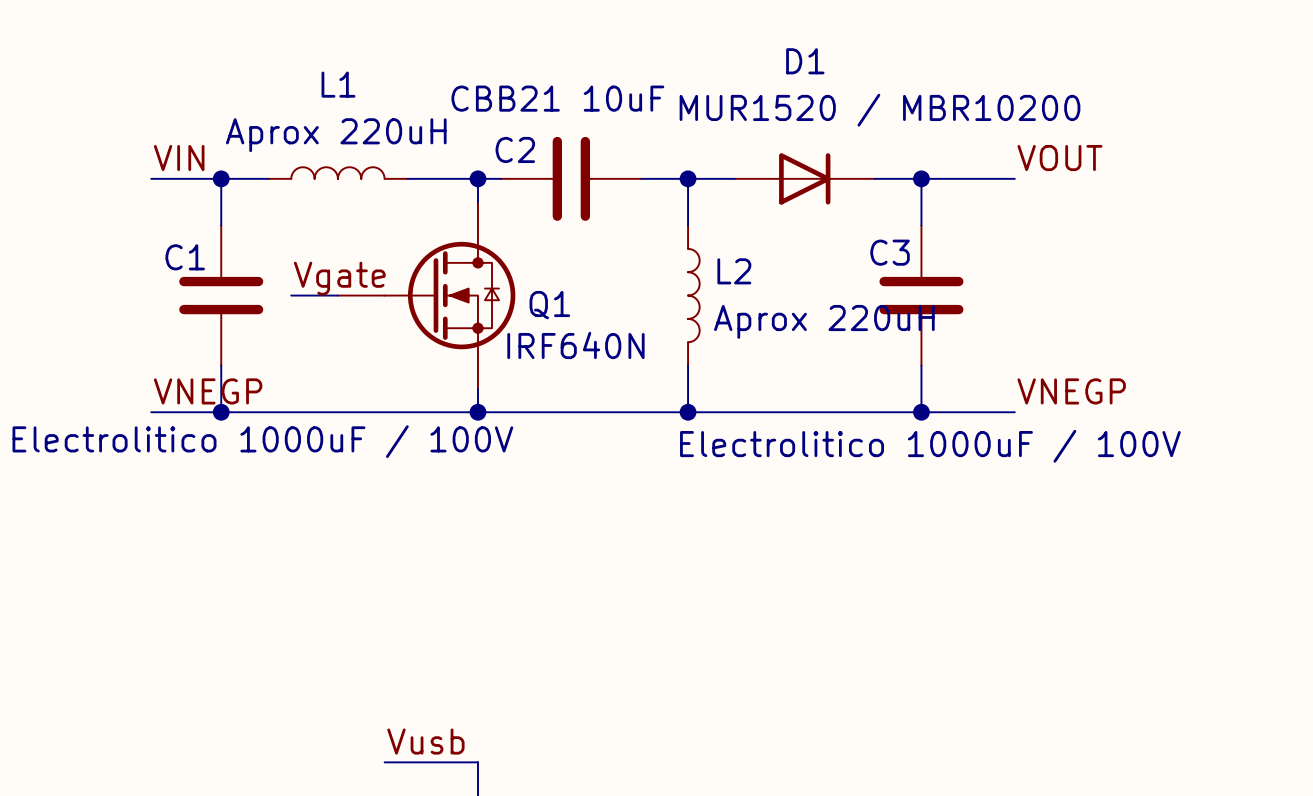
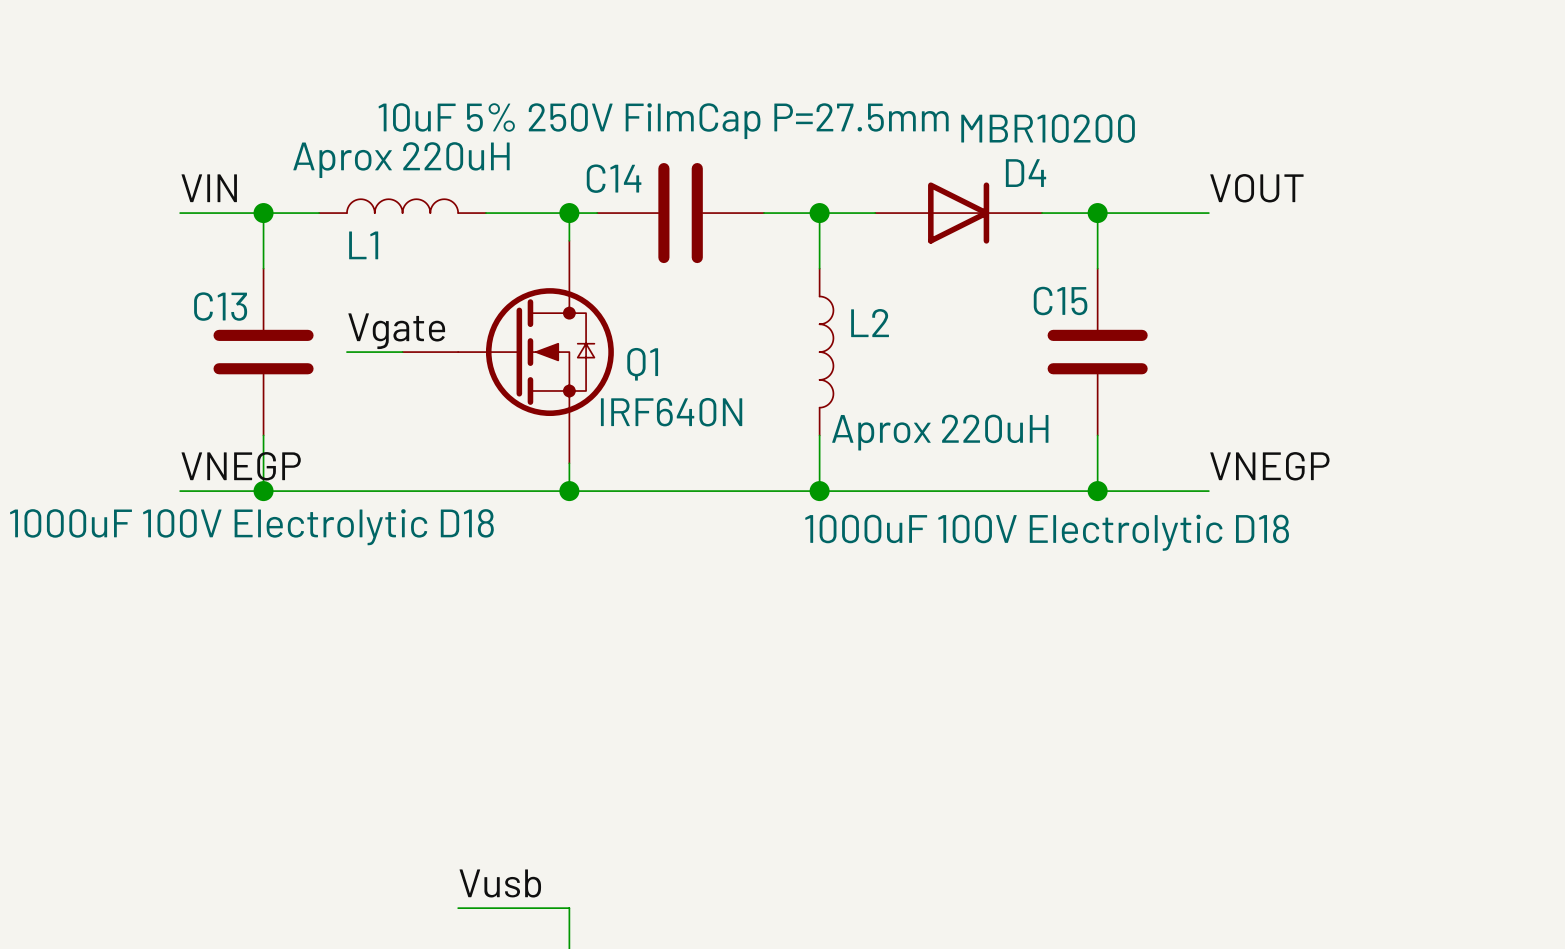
D1 name: D1 (805, 61) -> D4 (1026, 173)
L1 name position: L1 (338, 84) -> L1 (363, 245)
C2 value: CBB21 10uF (557, 98) -> 10uF 5% 250V FilmCap P=27.5mm (663, 121)
D1 value: MUR1520 / MBR10200 (879, 110) -> MBR10200 (1048, 128)
C2 name: C2 (515, 149) -> C14 (614, 178)
C3 name: C3 (890, 252) -> C15 (1060, 301)
C1 name: C1 (185, 257) -> C13 (220, 306)
L2 value position: Aprox 220uH (824, 321) -> Aprox 220uH (940, 432)
C1 value: Electrolitico 1000uF / 100V (262, 441) -> 1000uF 100V Electrolytic D18 (251, 527)
C3 value: Electrolitico 1000uF / 100V (930, 446) -> 1000uF 100V Electrolytic D18 (1047, 532)

